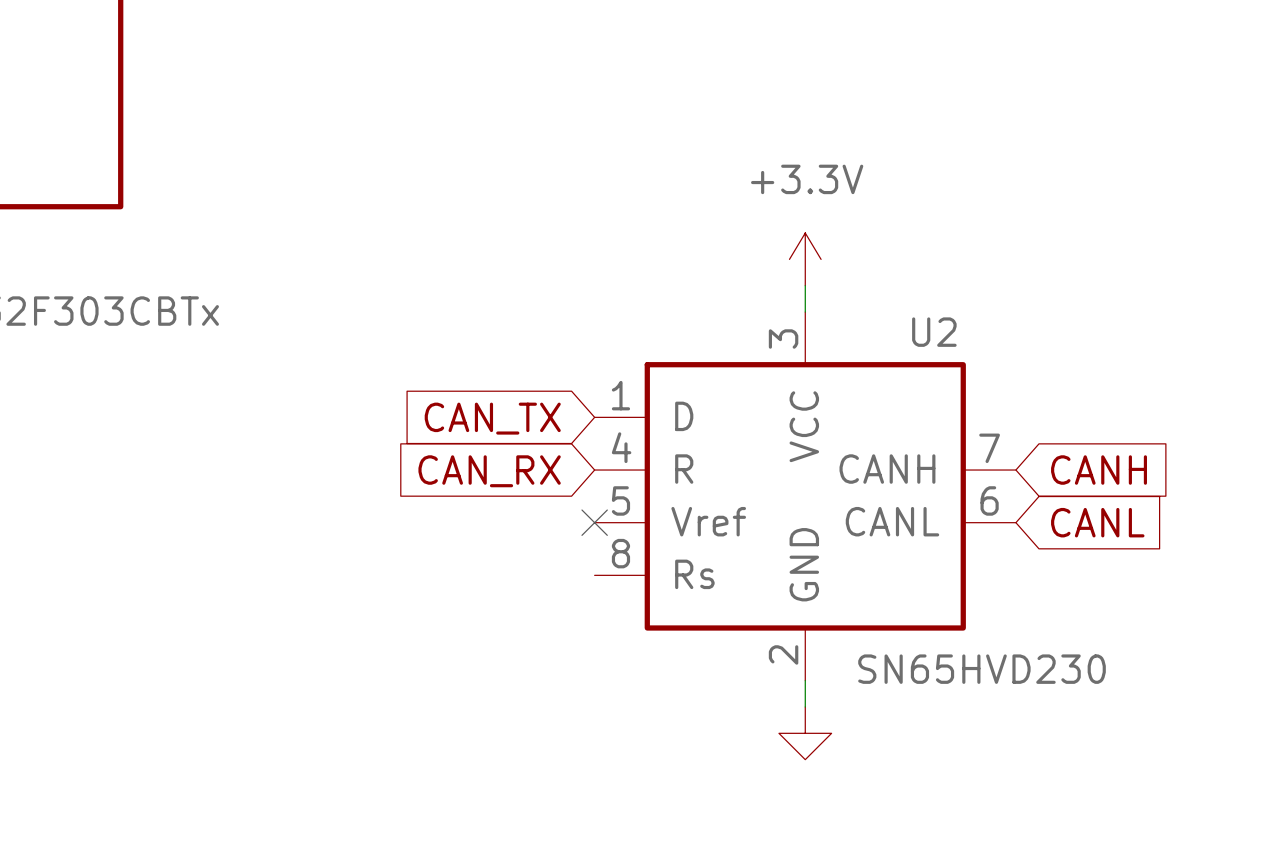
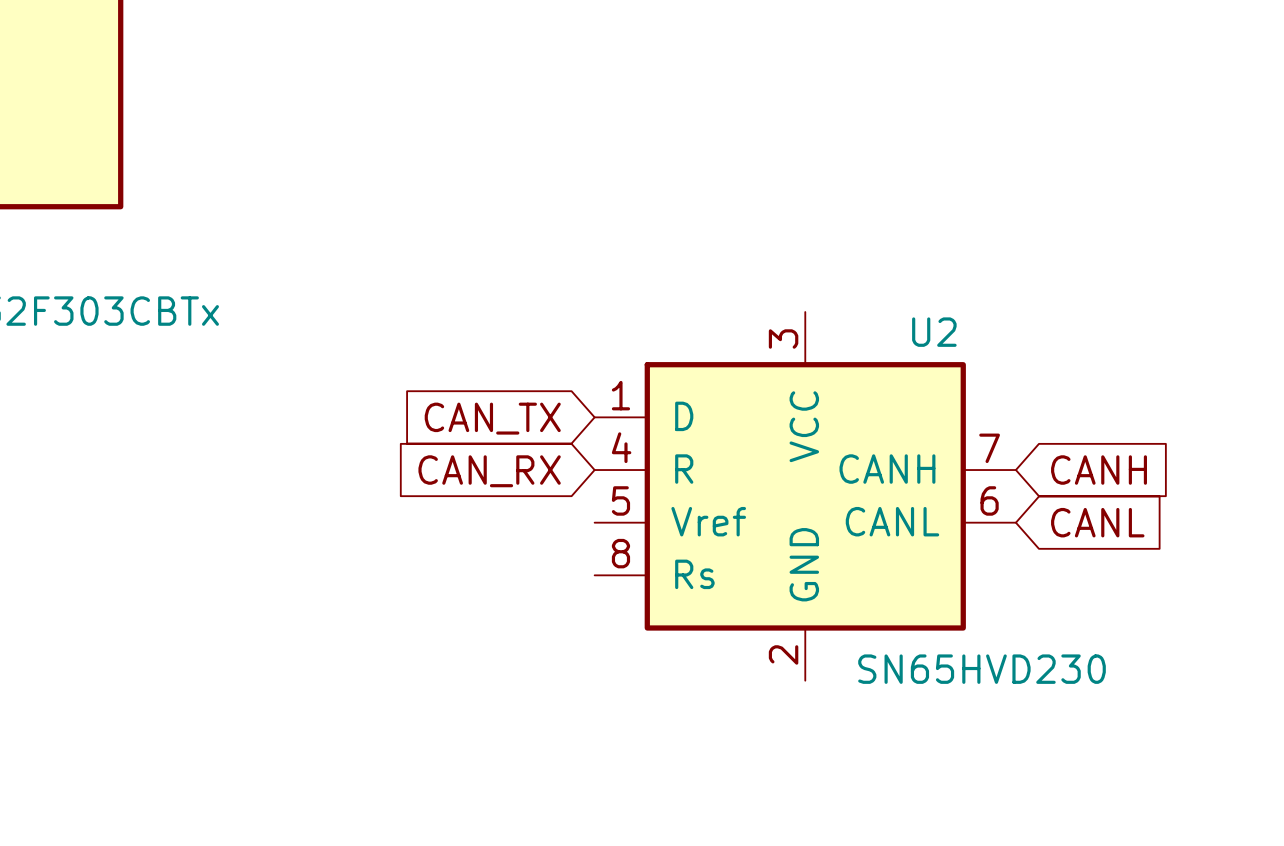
power symbol: +3.3V (805, 259) -> none
wire: (805, 285) (805, 312) -> none
no-connect mark: (594, 522) -> none
wire: (805, 680) (805, 706) -> none
power symbol: (805, 733) -> none

